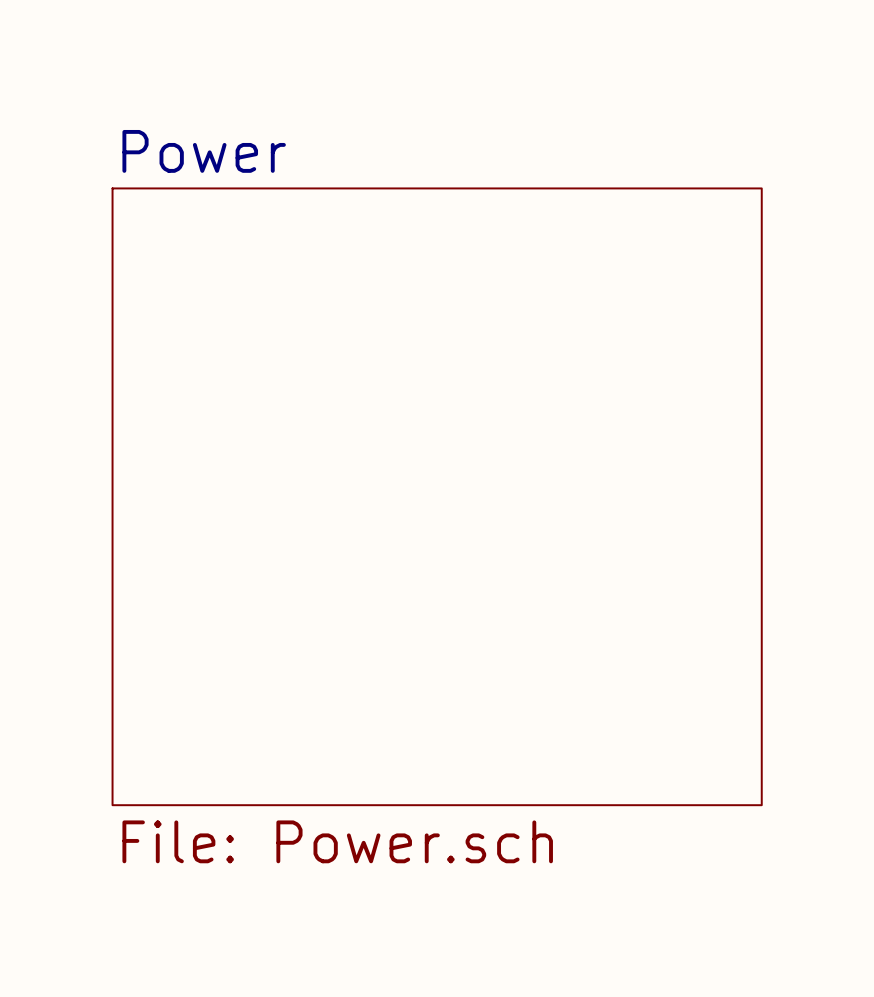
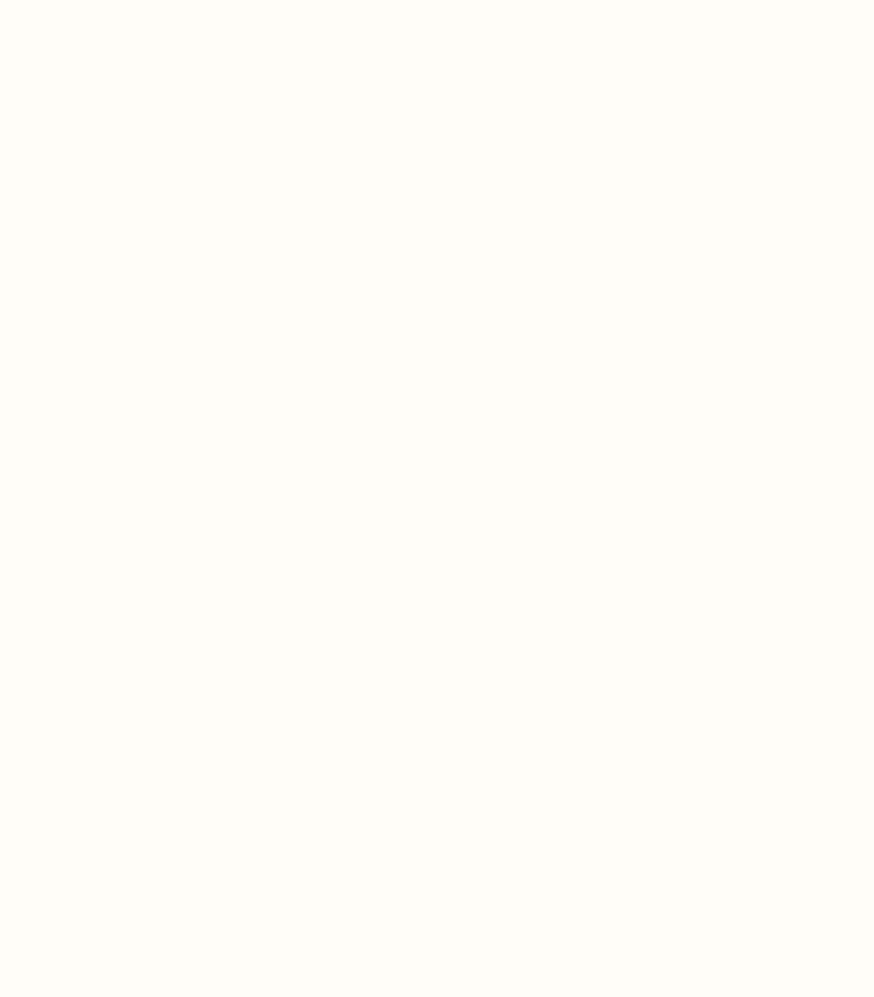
sheet Power: File: Power.sch (437, 496) -> none

